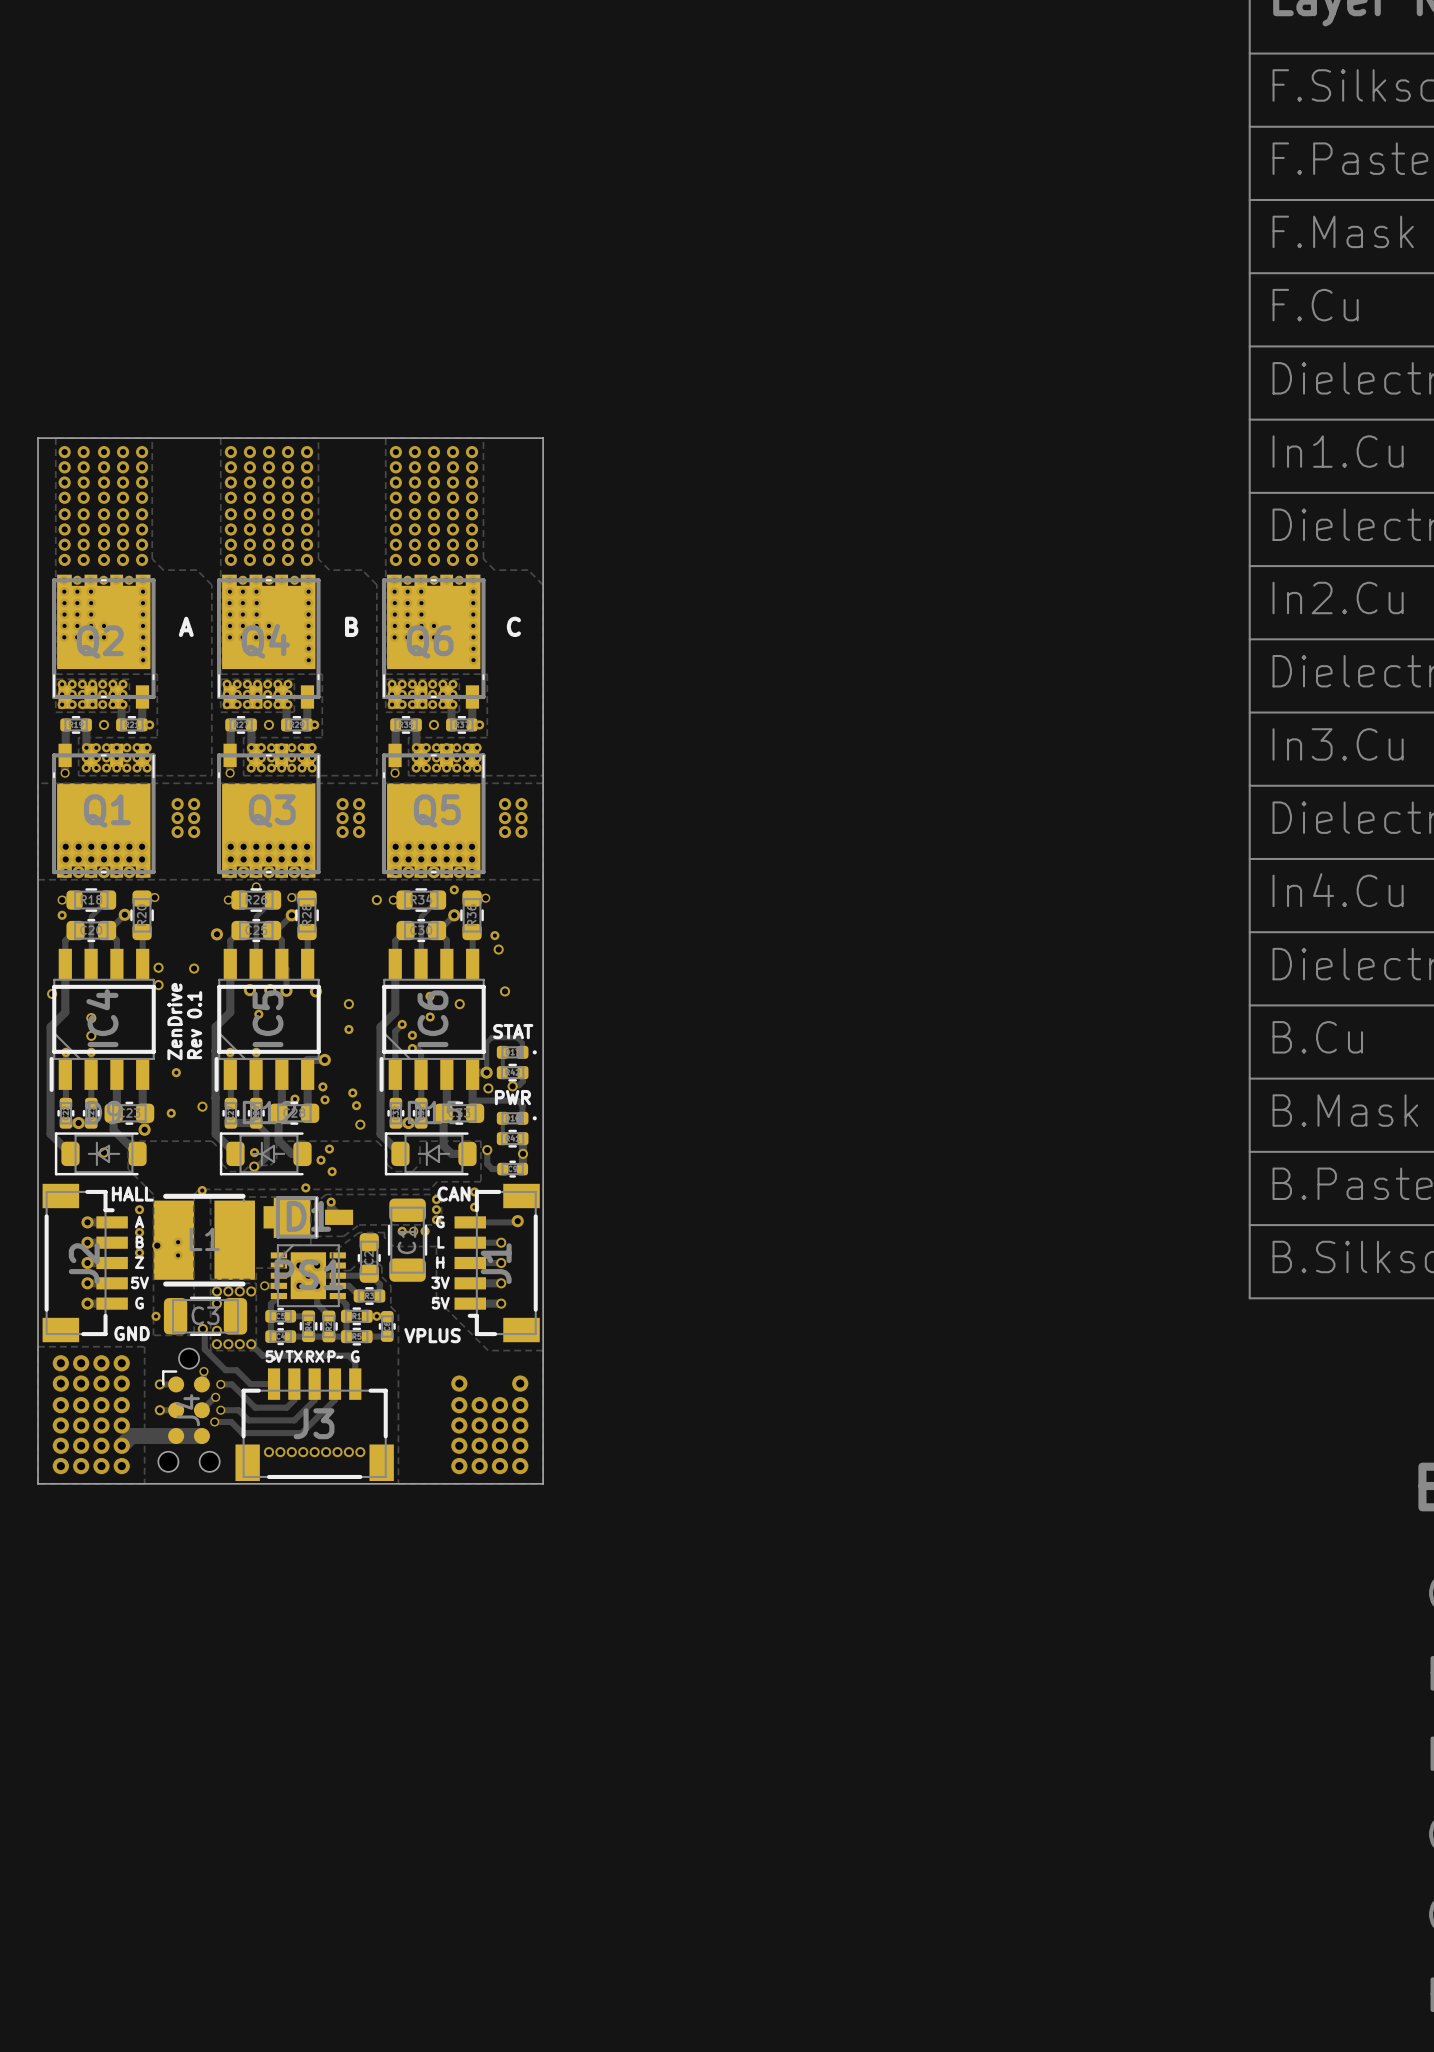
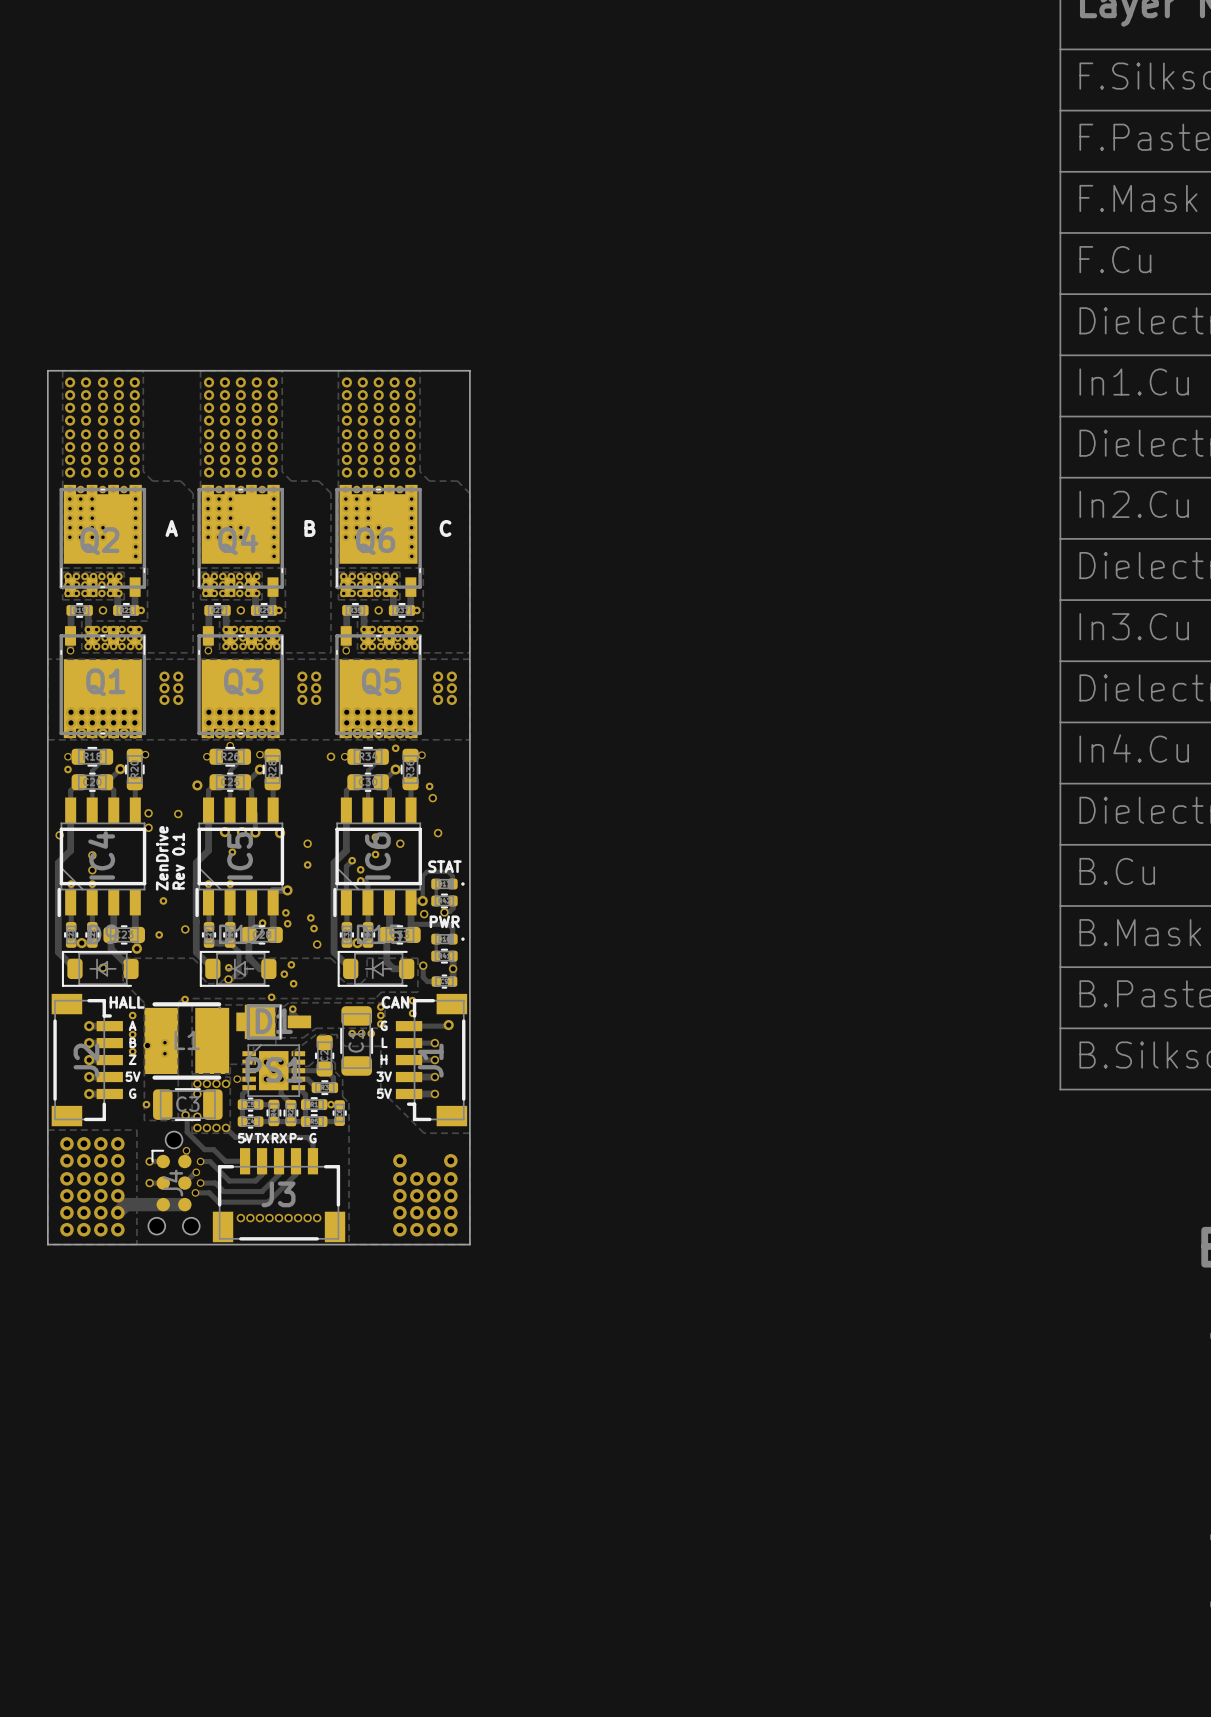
text: GND (132, 1333) -> none
text: VPLUS (432, 1335) -> none

